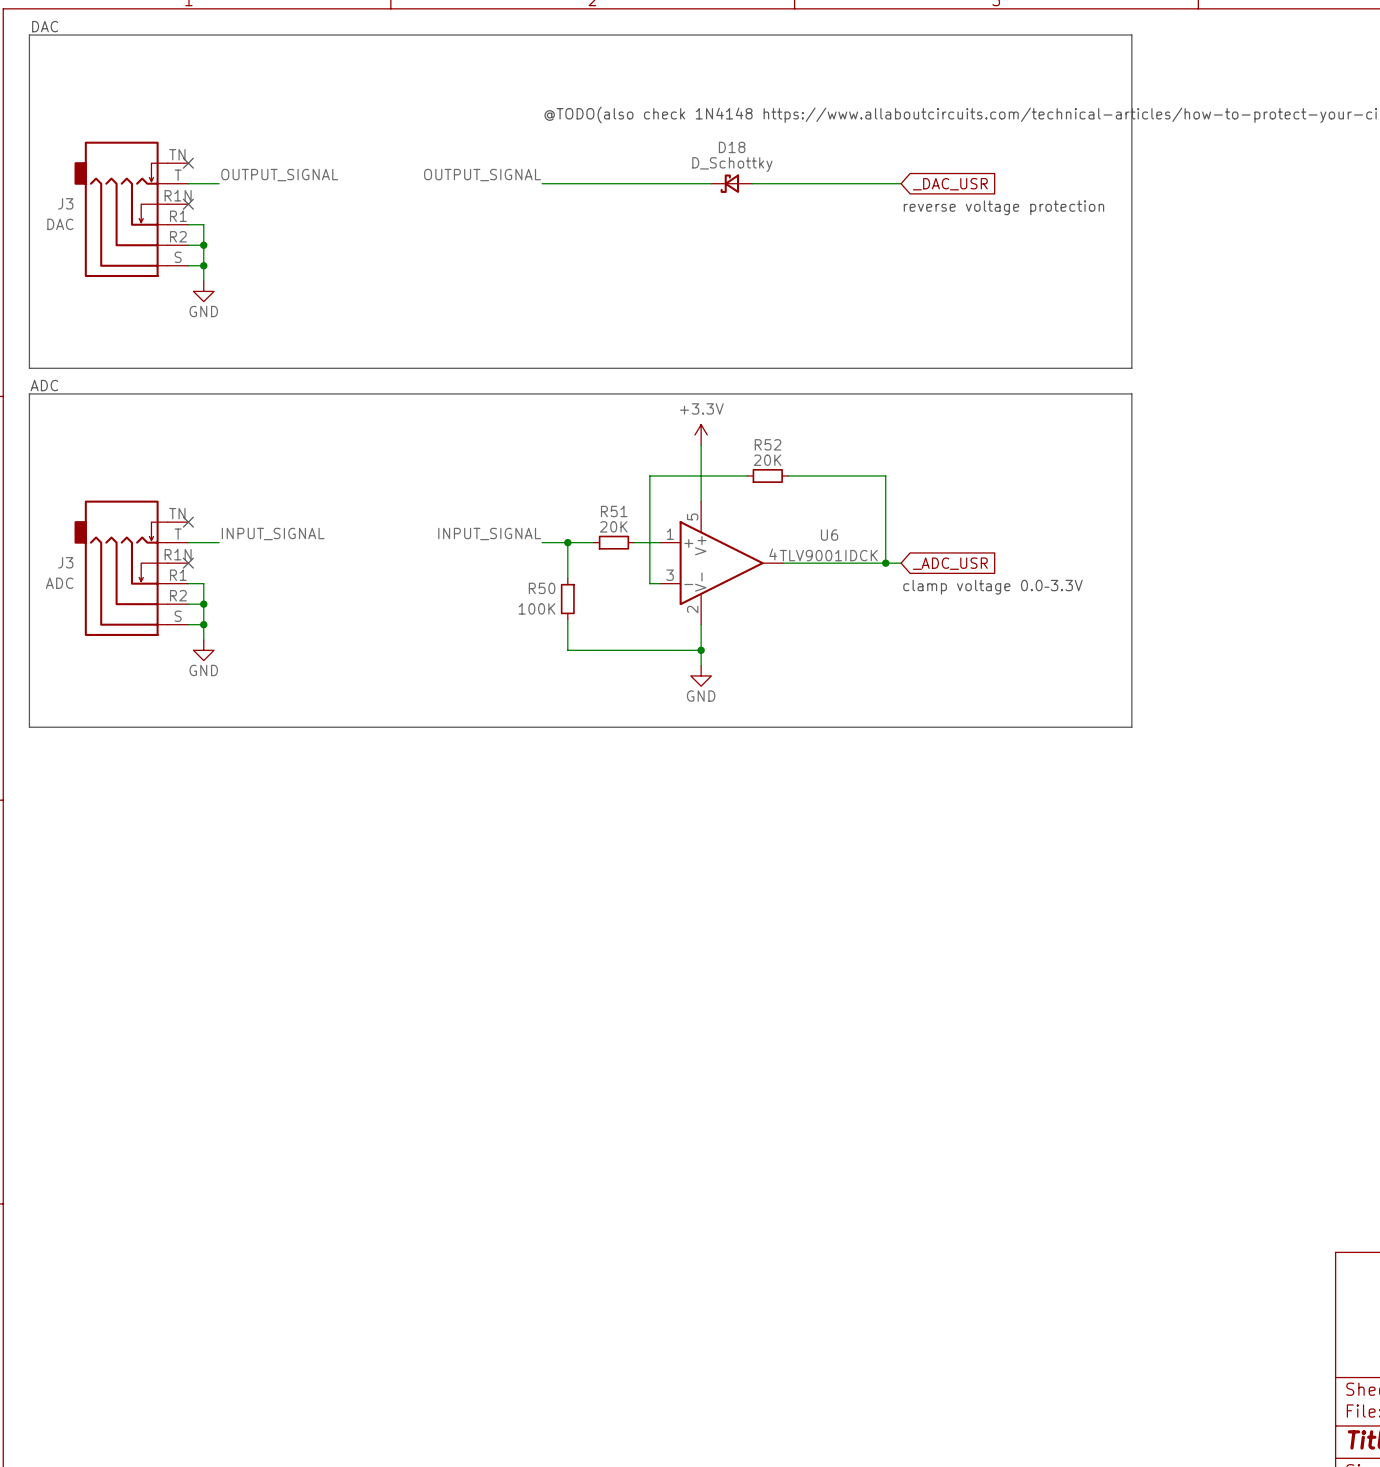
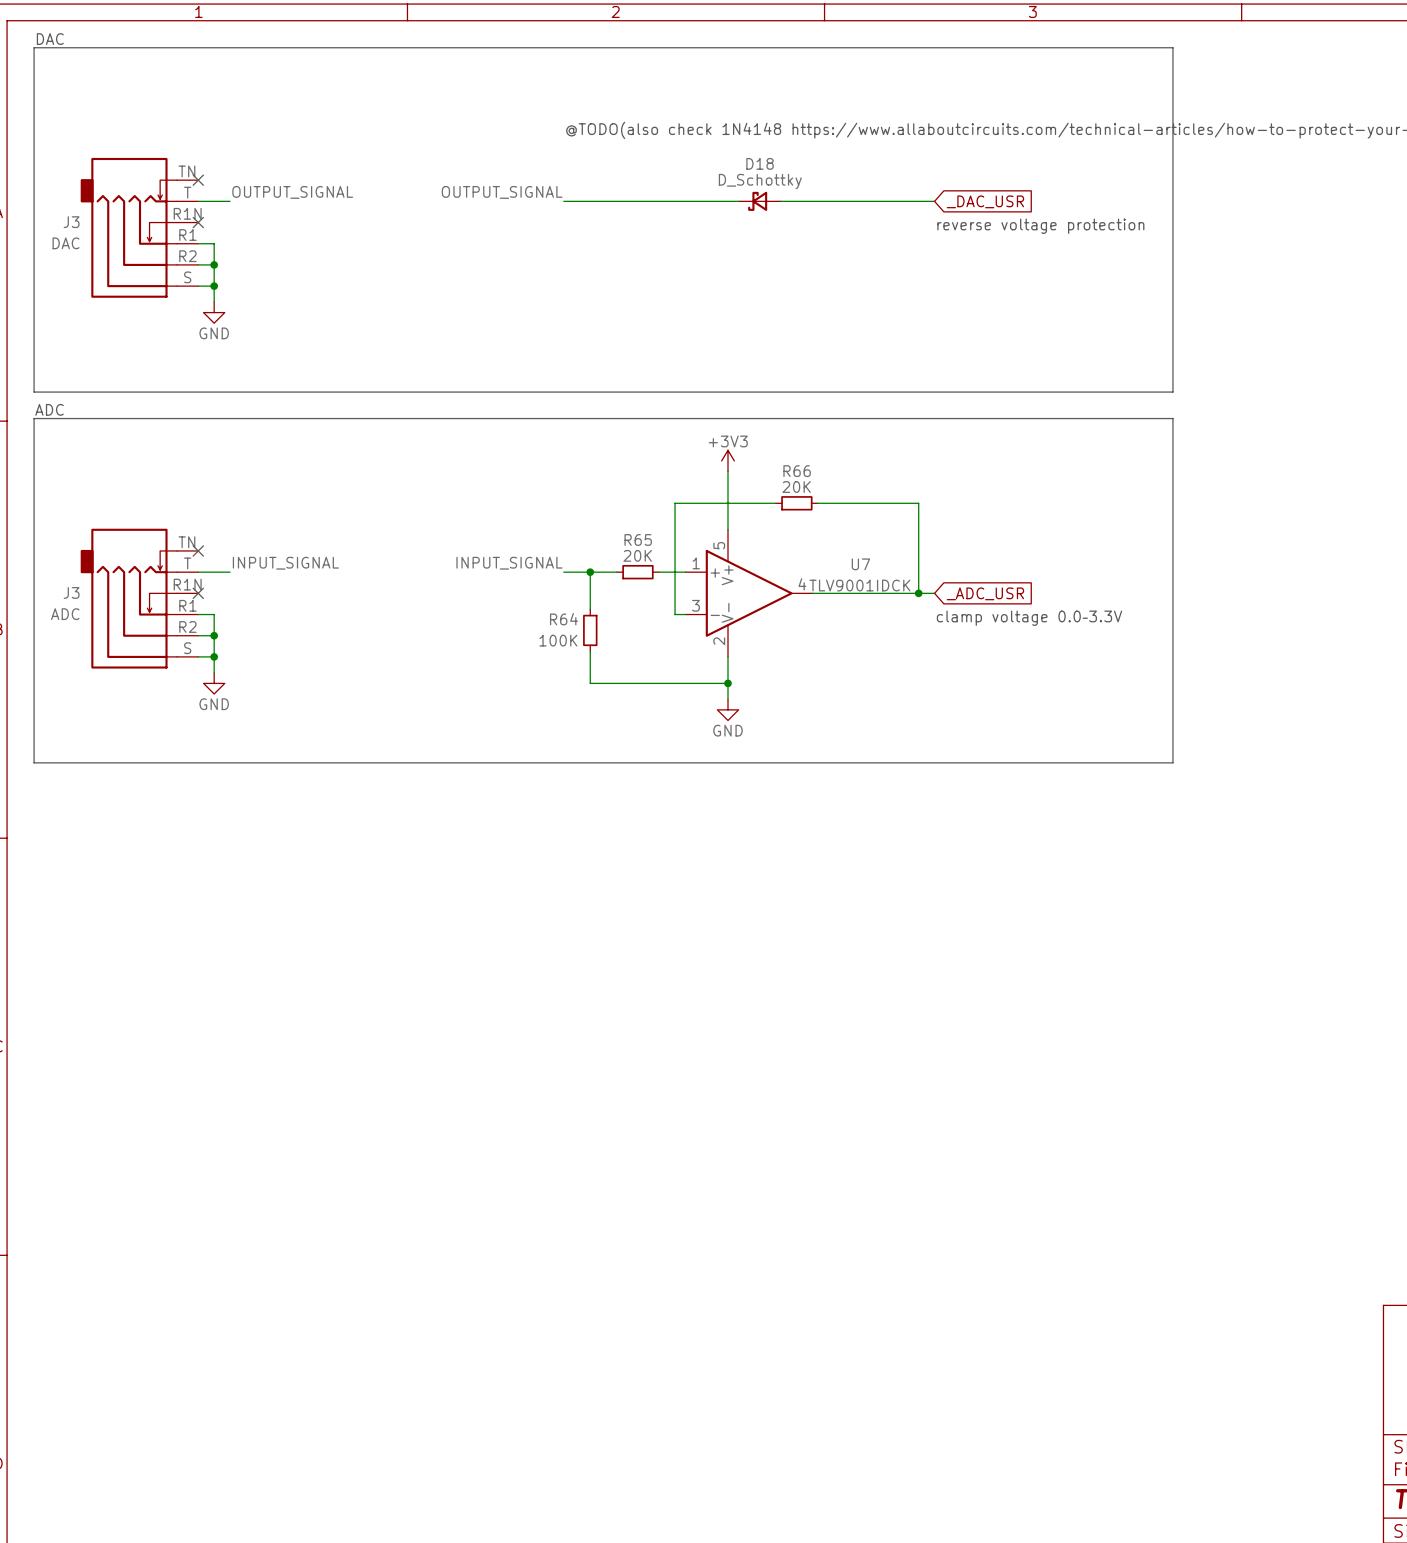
power symbol: +3.3V (701, 434) -> +3V3 (728, 460)
R52 name: R52 (768, 444) -> R66 (797, 471)
R51 name: R51 (614, 511) -> R65 (638, 539)
U6 name: U6 (829, 535) -> U7 (860, 564)
R50 name: R50 (542, 588) -> R64 (563, 619)

